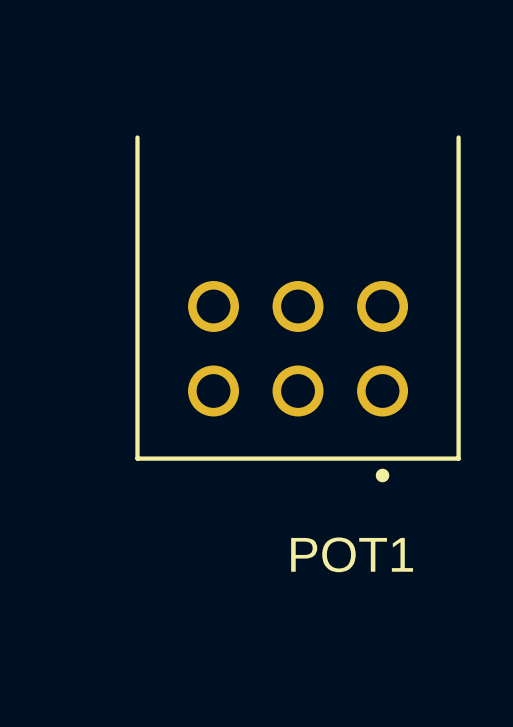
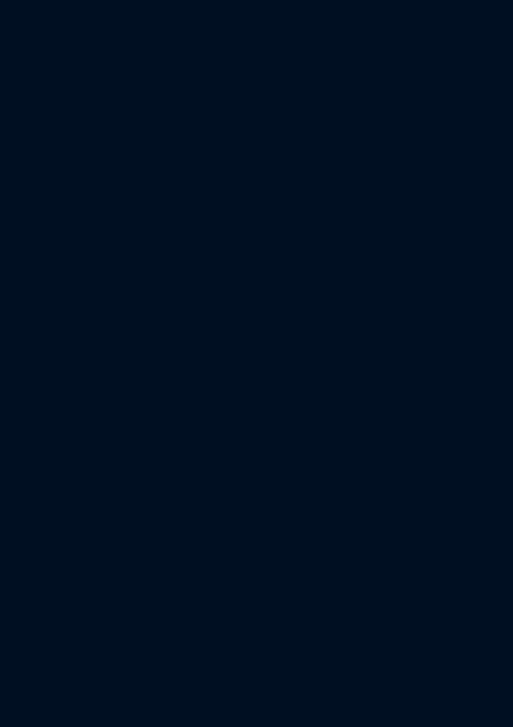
POT1: (298, 308) -> none

